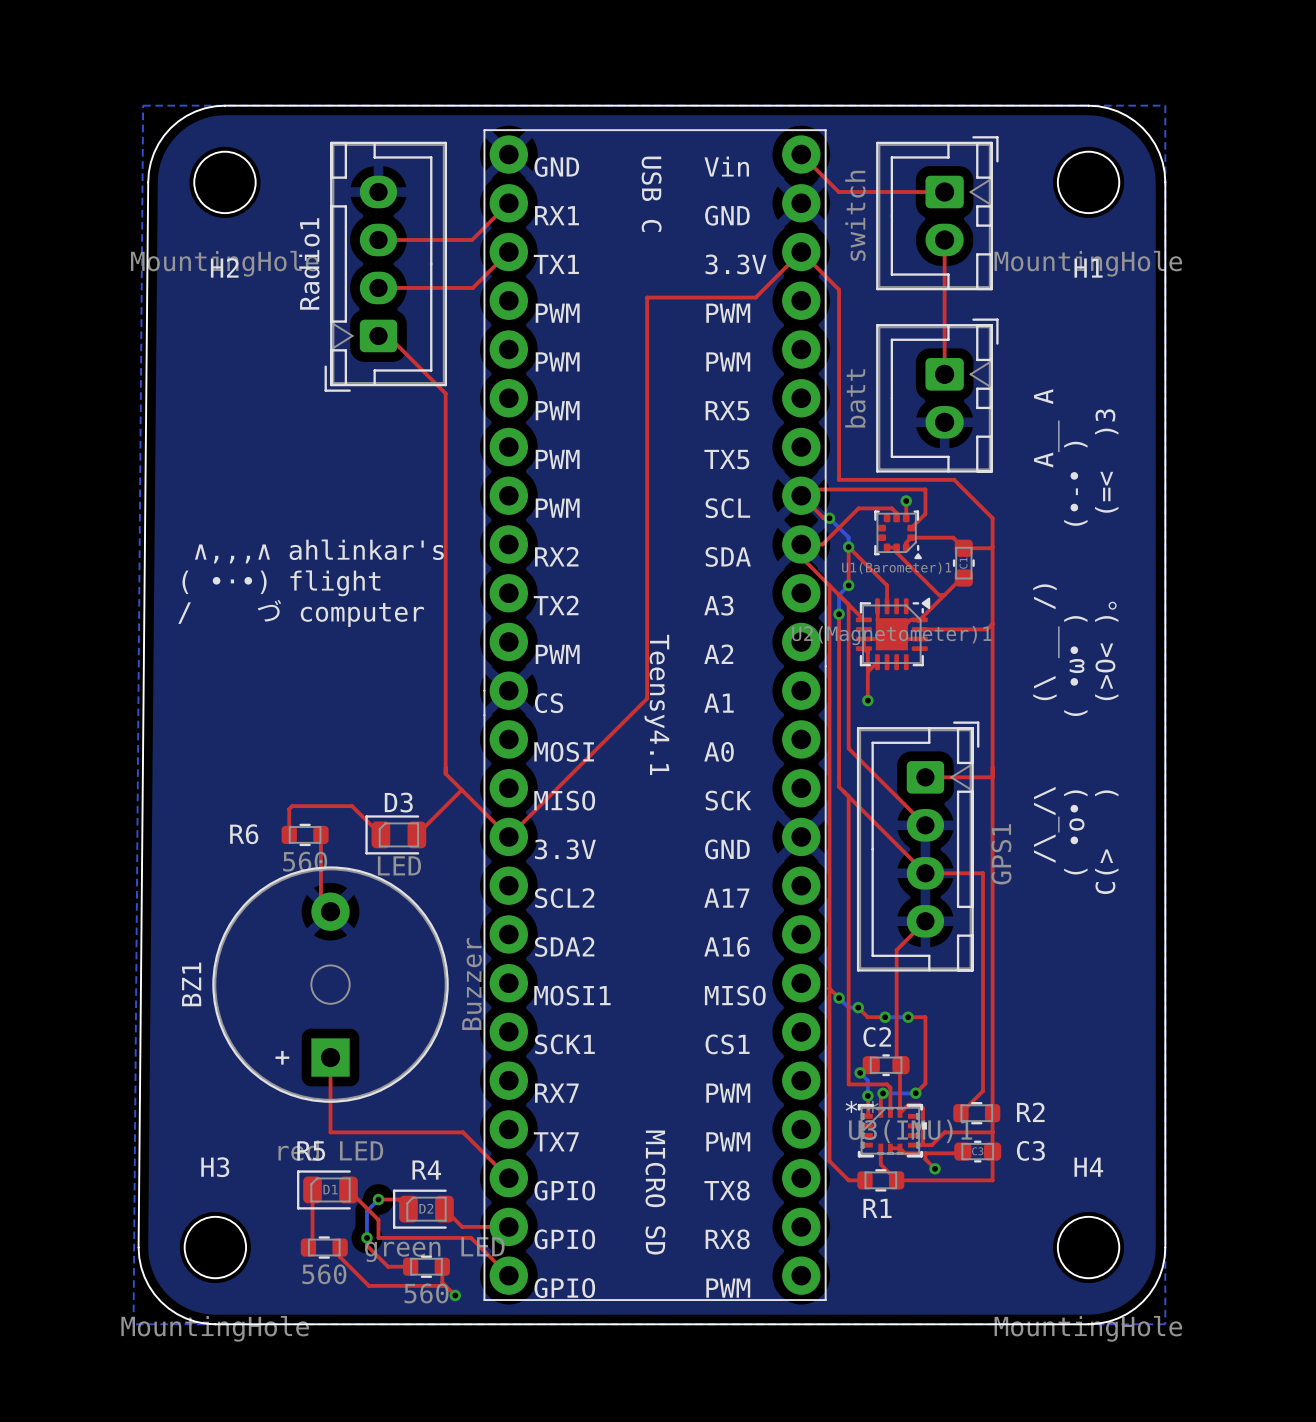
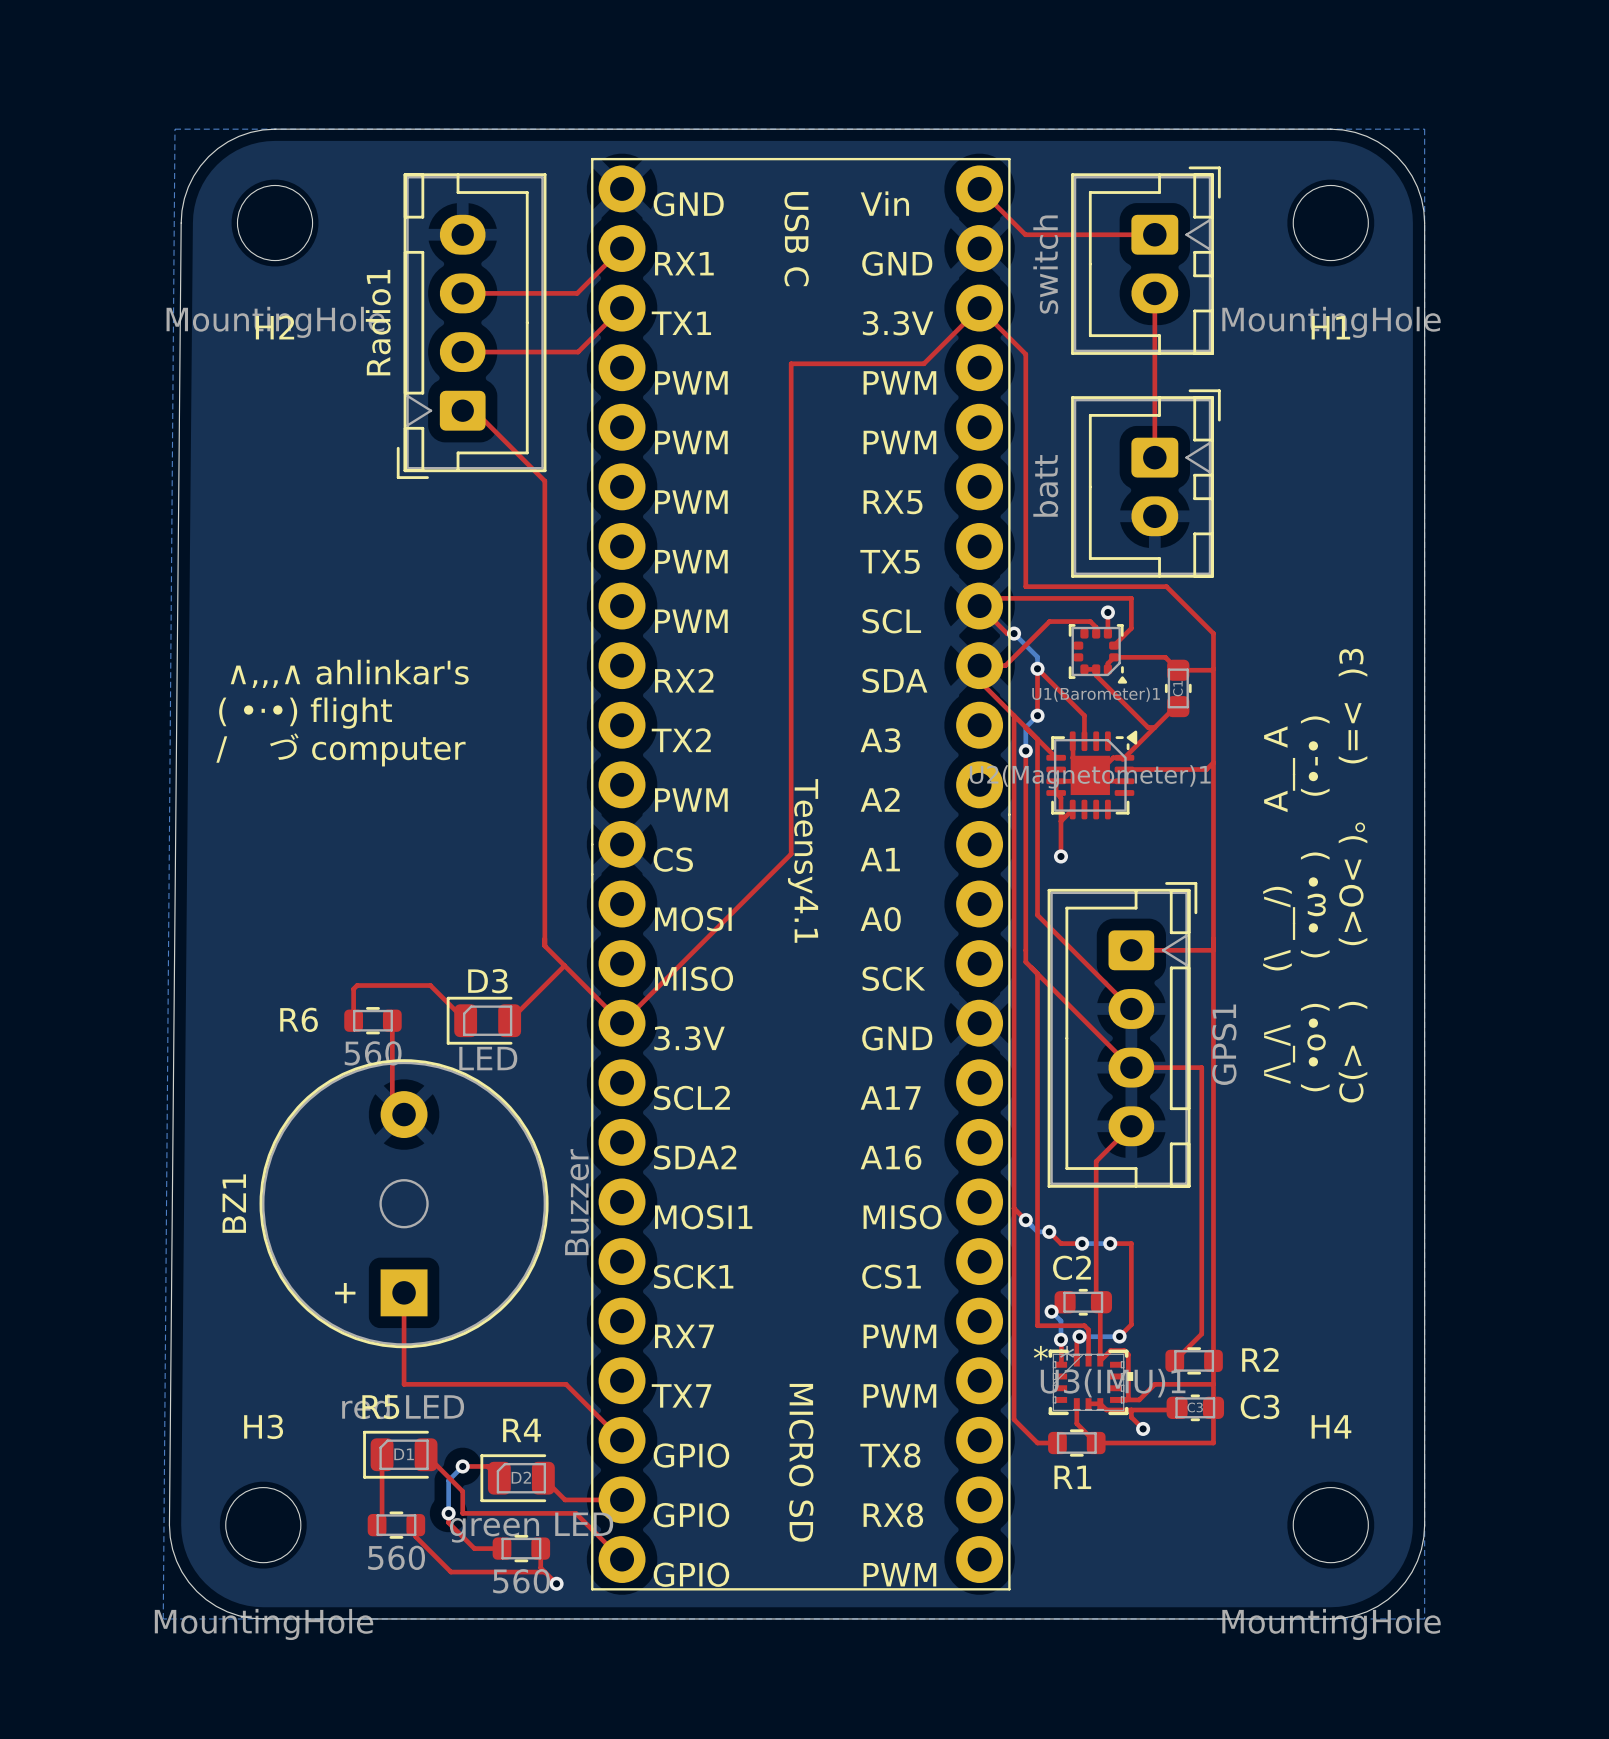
text: /\_/\ (\ __ /) A__ A (1046, 626) -> /\_/\ (\ __/) A__ A (1279, 905)

